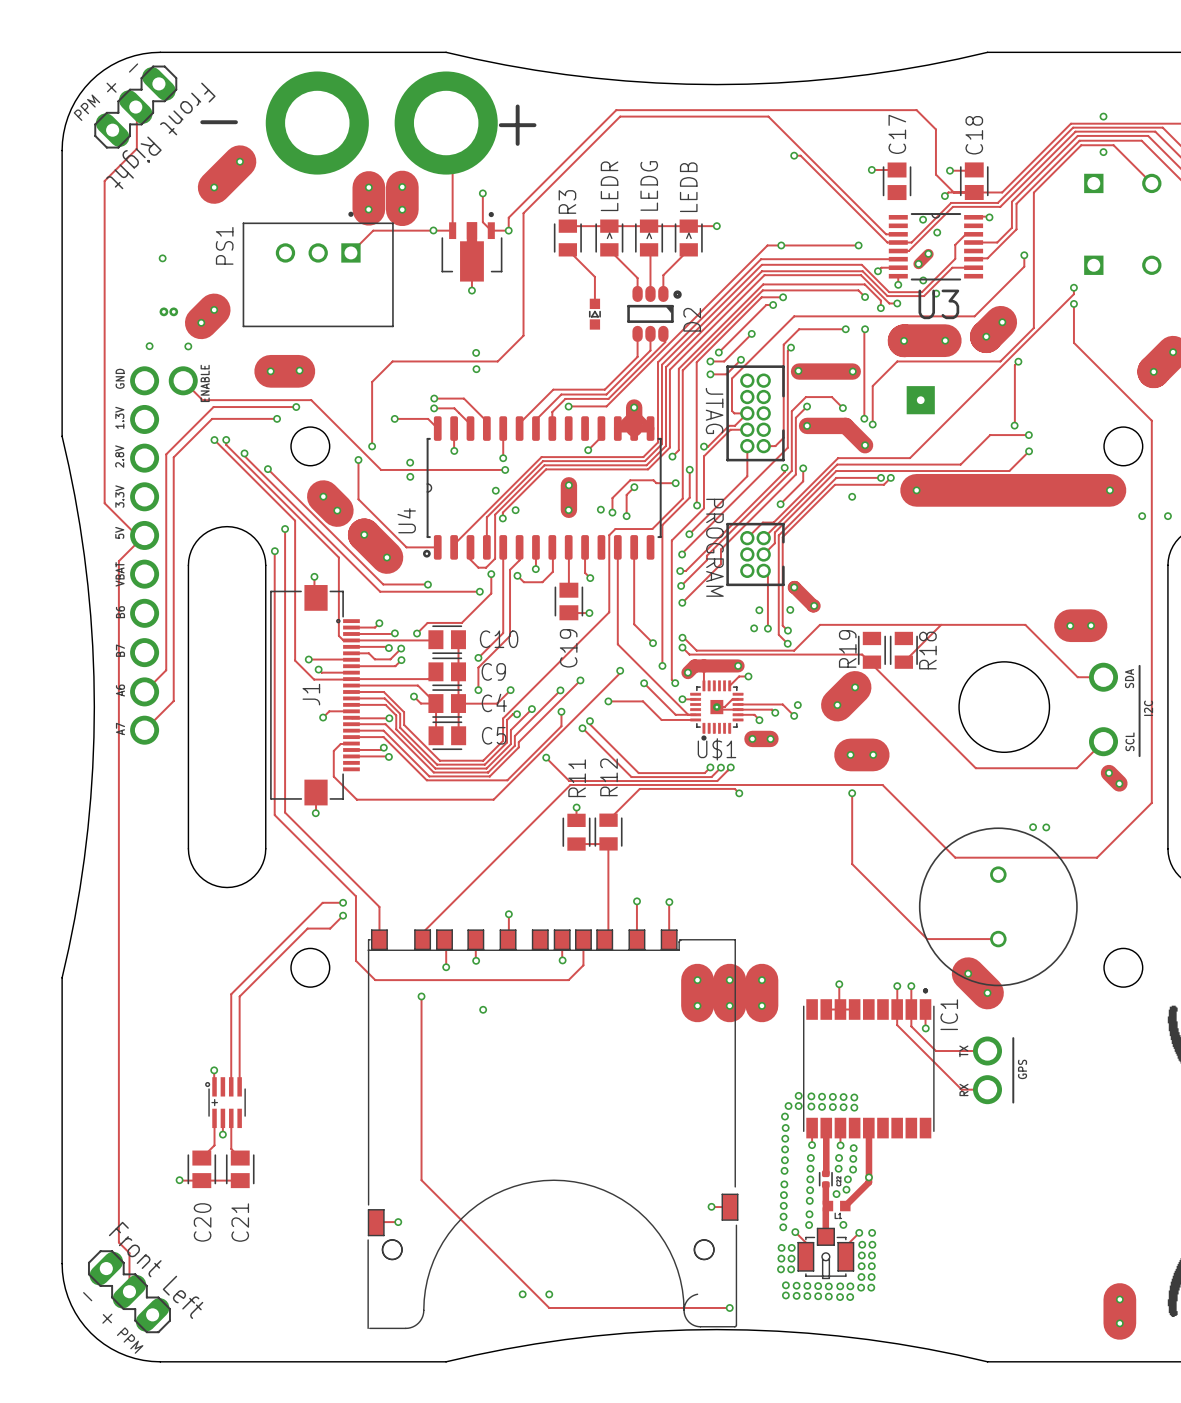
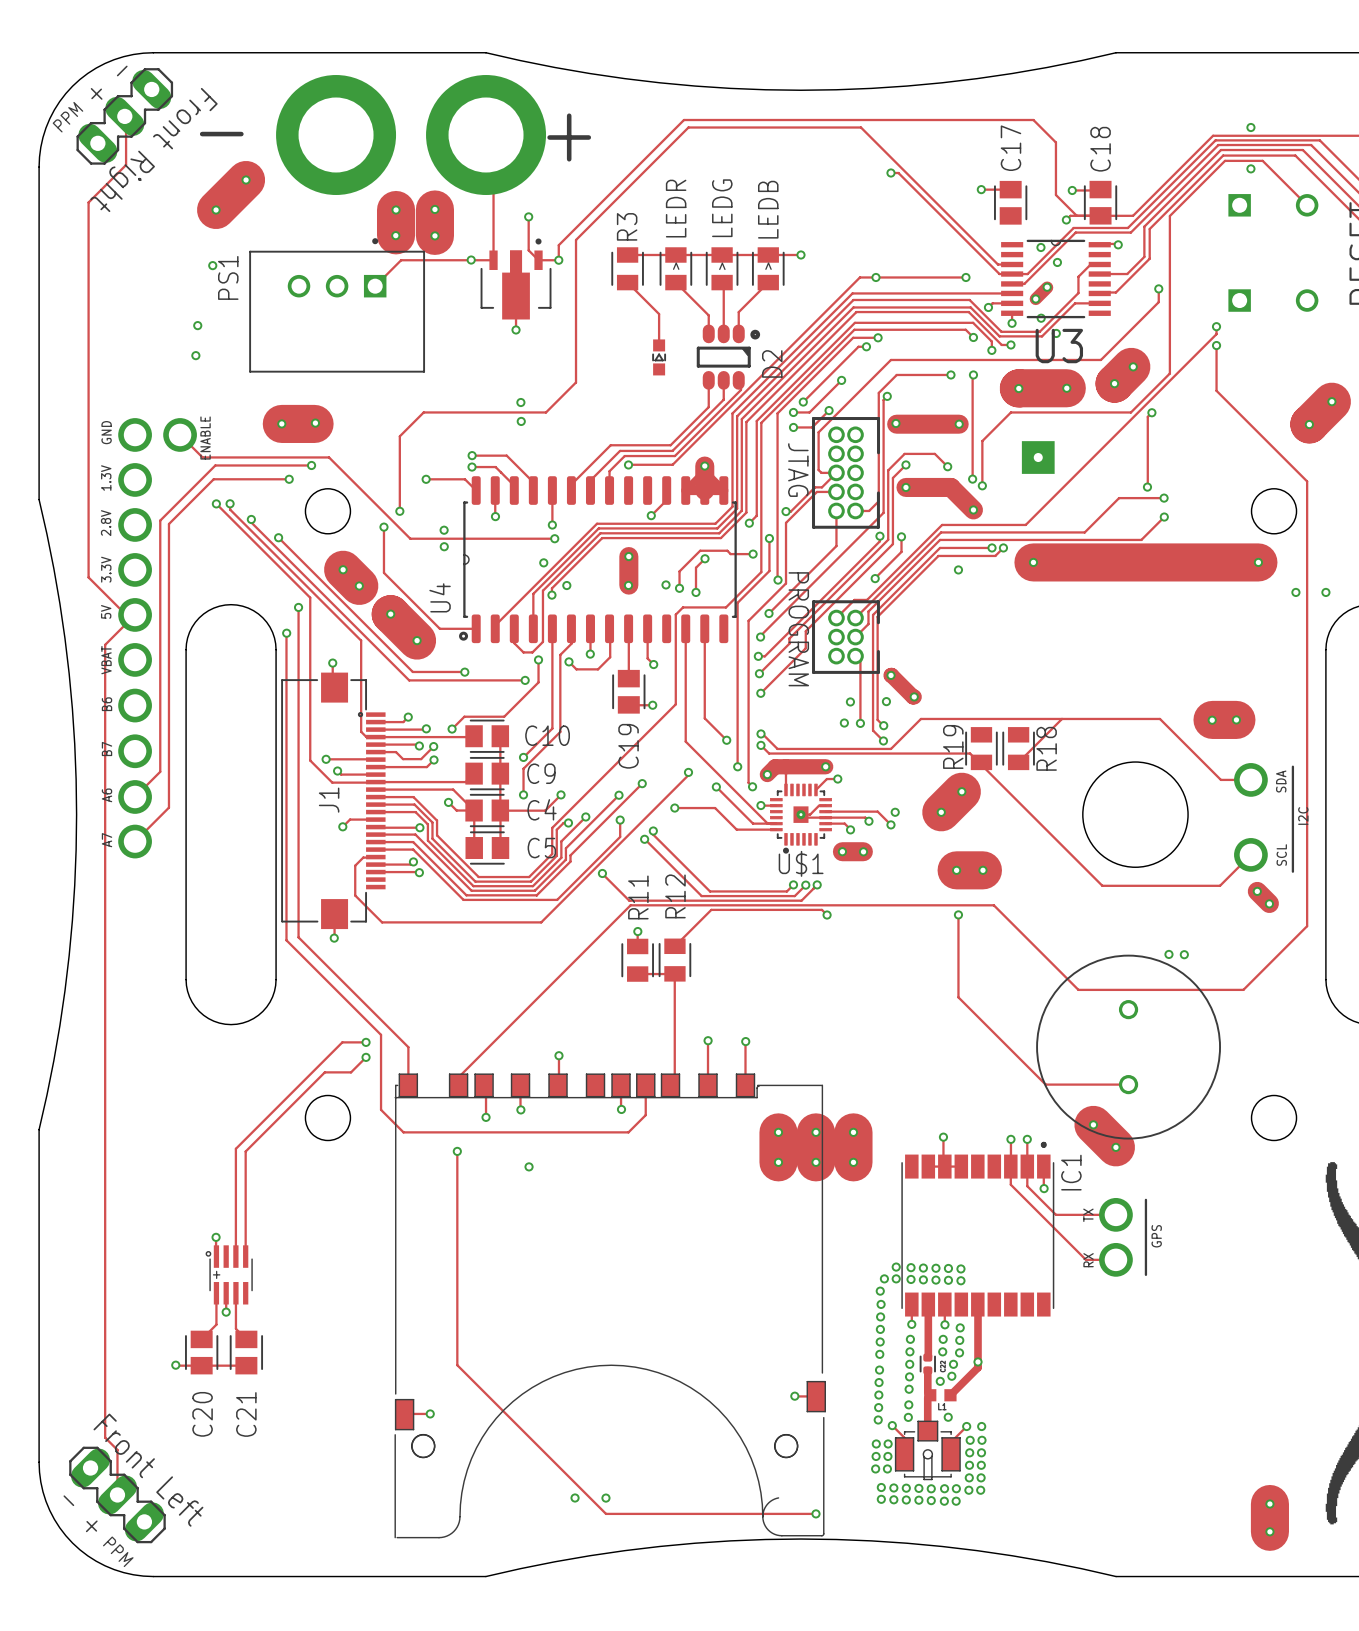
via: none -> (212, 265)
via: (162, 258) -> none
via: none -> (197, 325)
track: (214, 309) (201, 322) -> none
via: (214, 309) -> none
part: (168, 311) -> none
via: none -> (195, 355)
via: (201, 322) -> none
via: (149, 346) -> none
via: (188, 346) -> none

